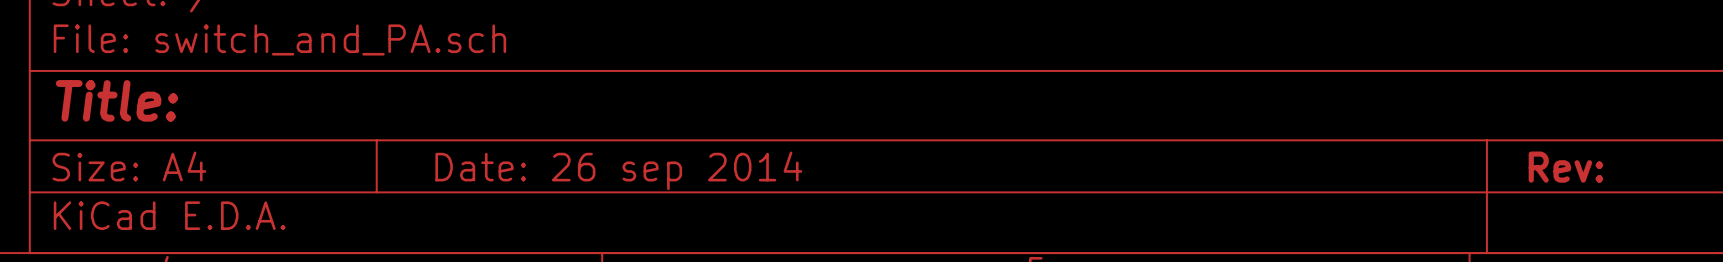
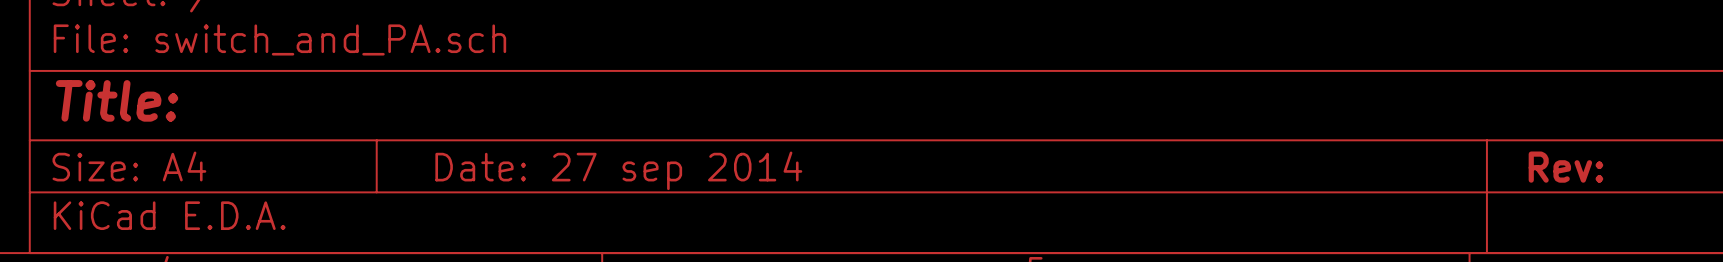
title block: Date: 26 sep 2014 (618, 170) -> Date: 27 sep 2014 (618, 170)

